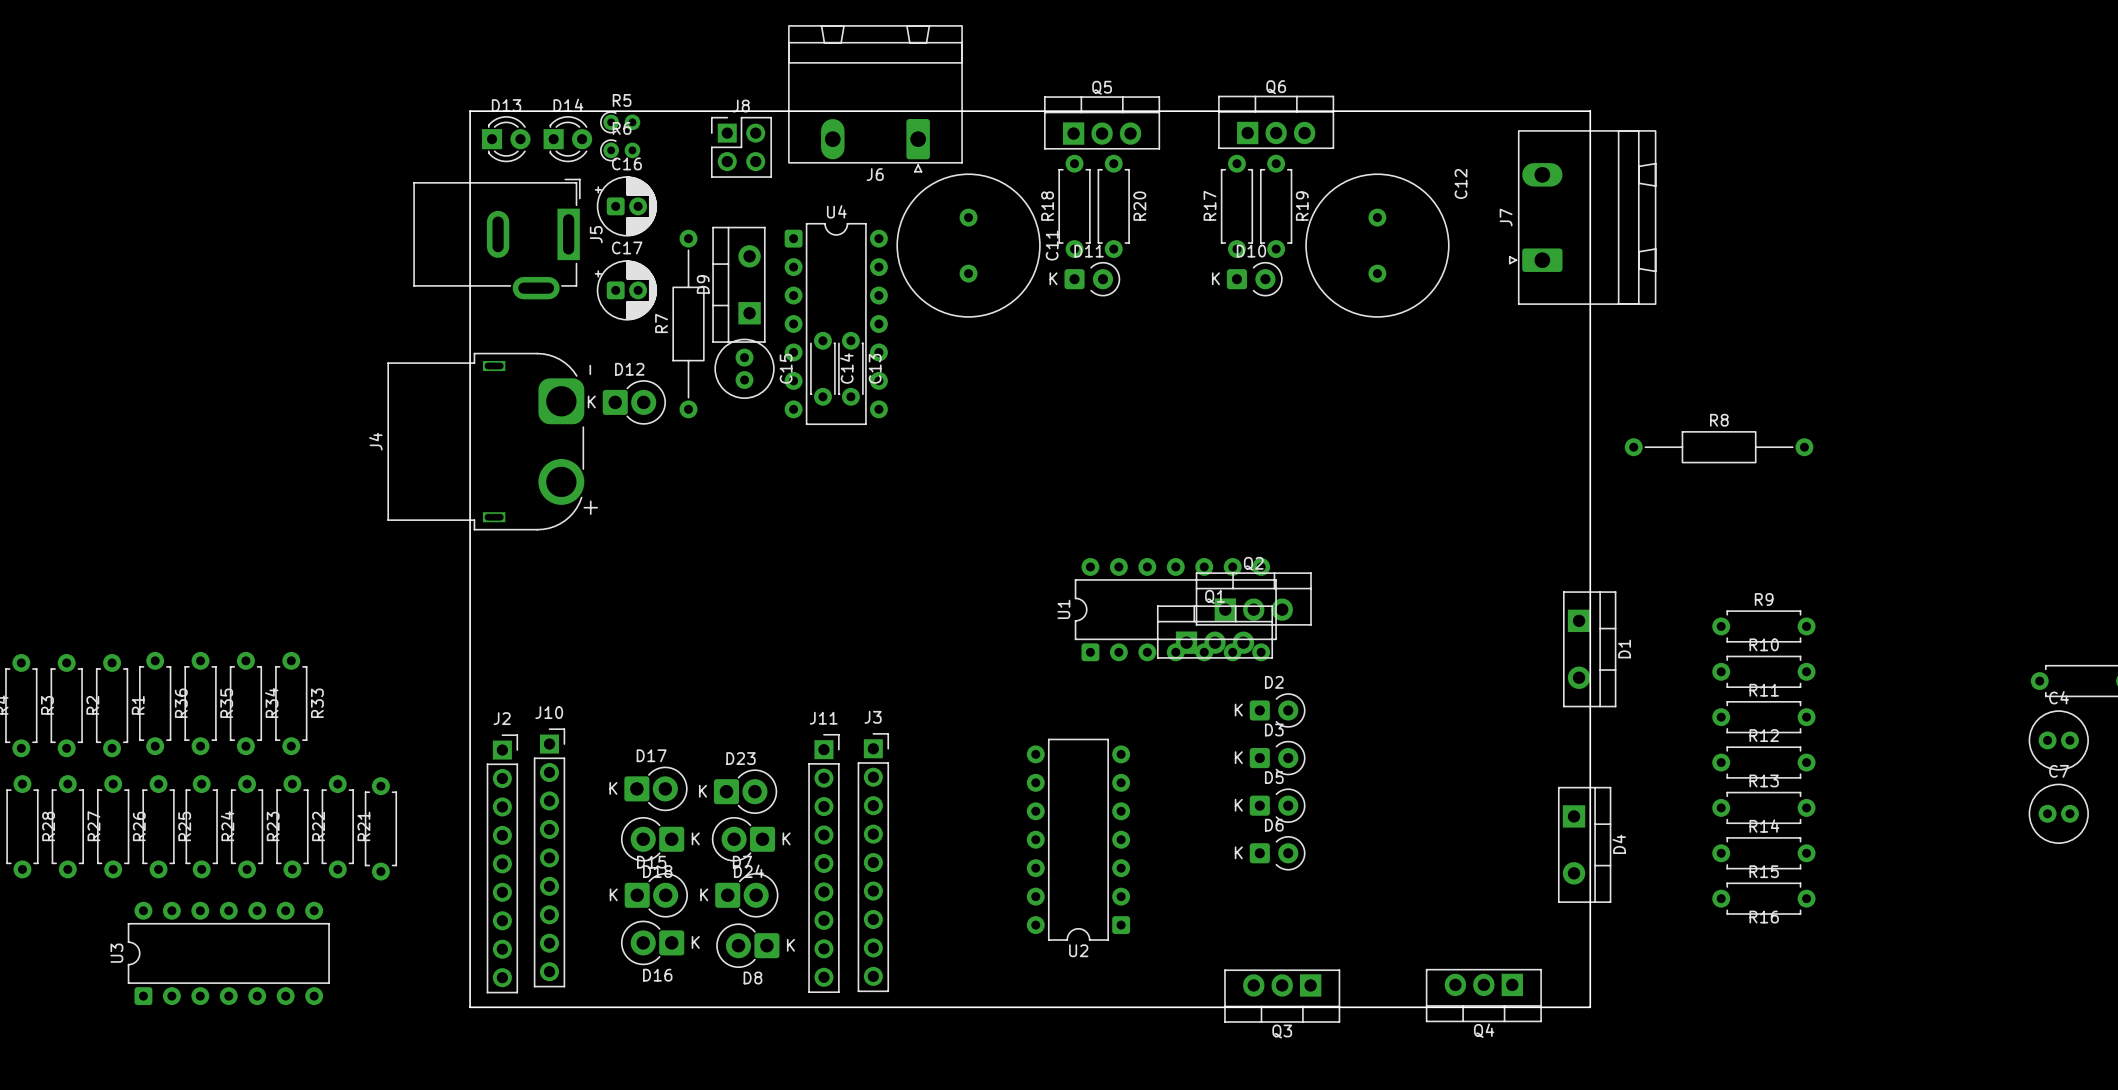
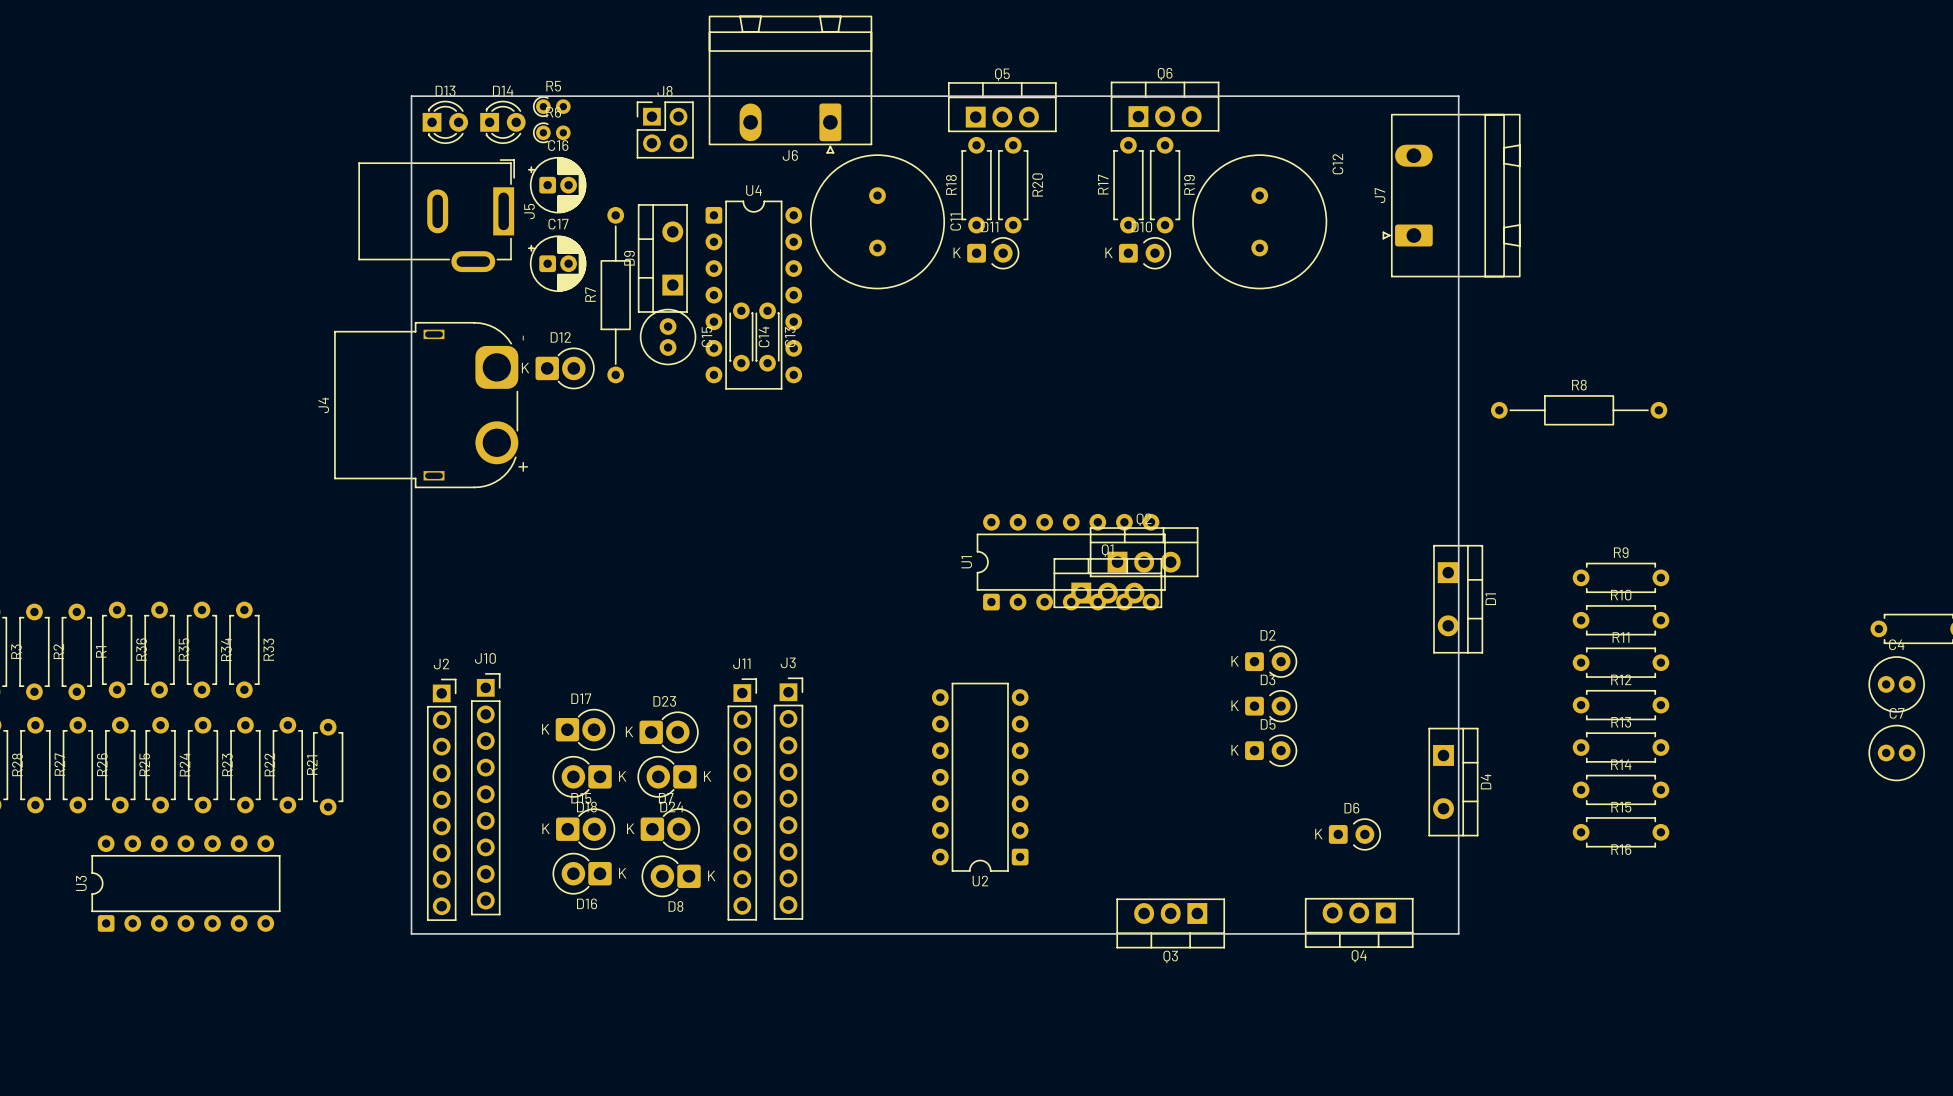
D2 position: (1277, 710) -> (1271, 661)
D3 position: (1277, 758) -> (1271, 706)
D5 position: (1277, 805) -> (1271, 750)
D6 position: (1277, 853) -> (1354, 834)

